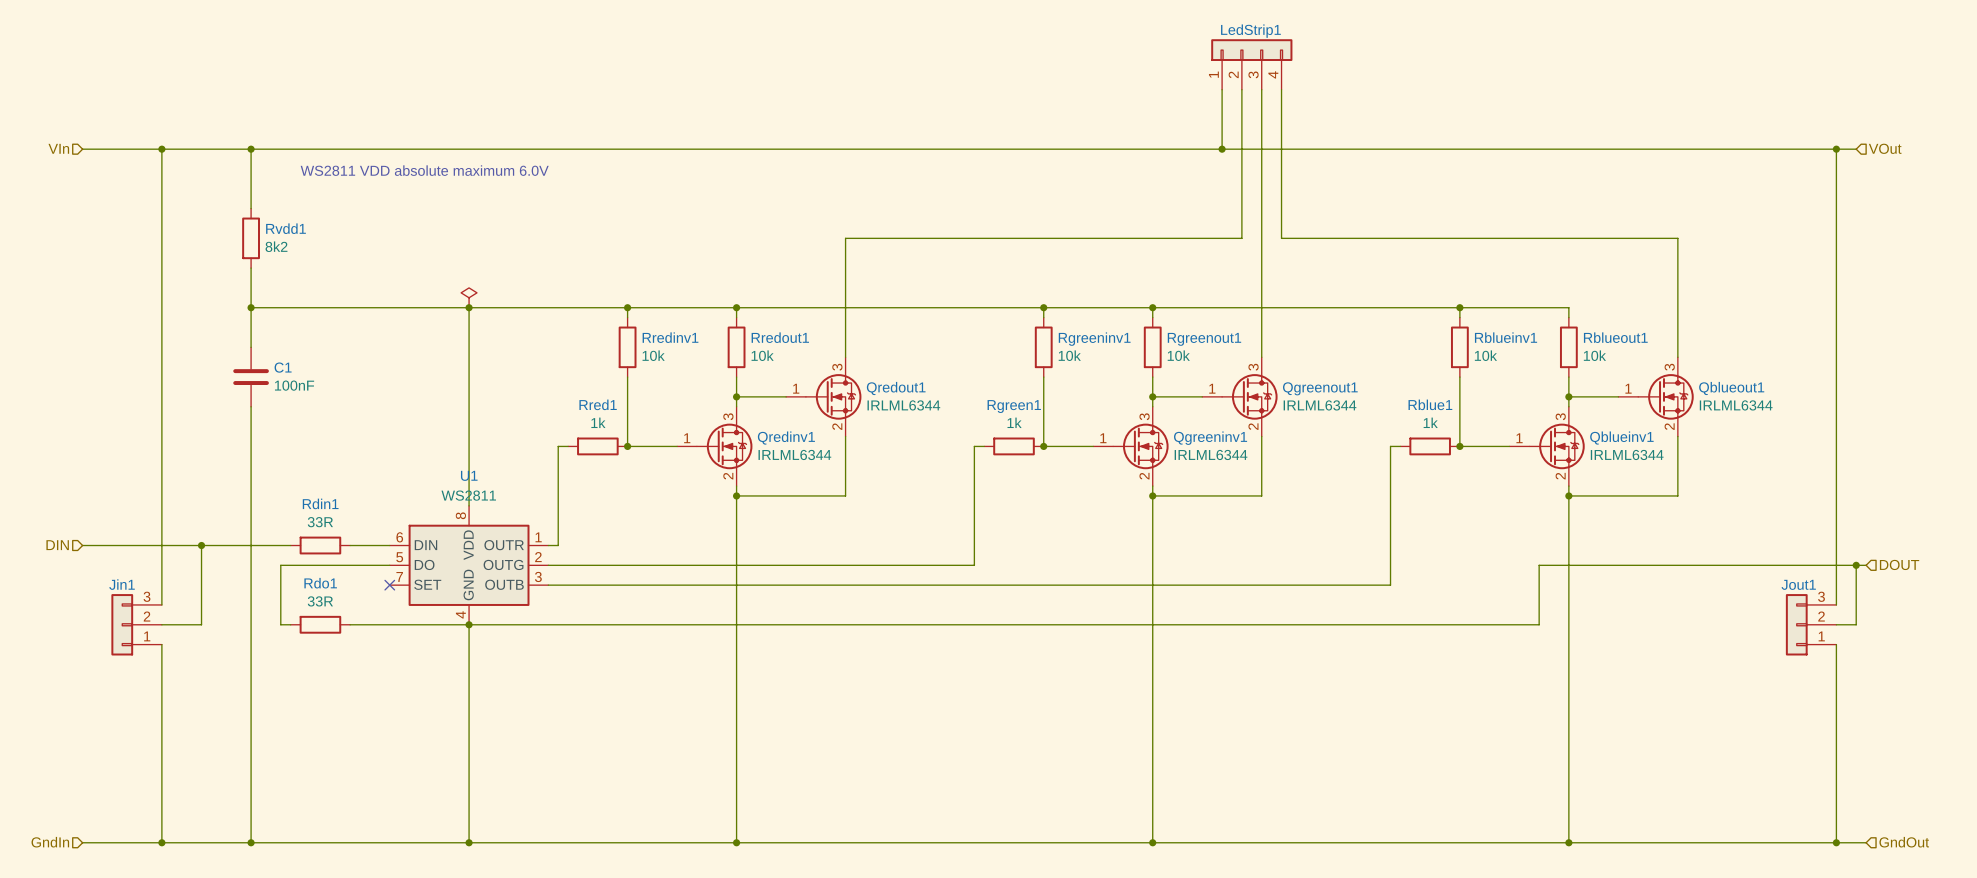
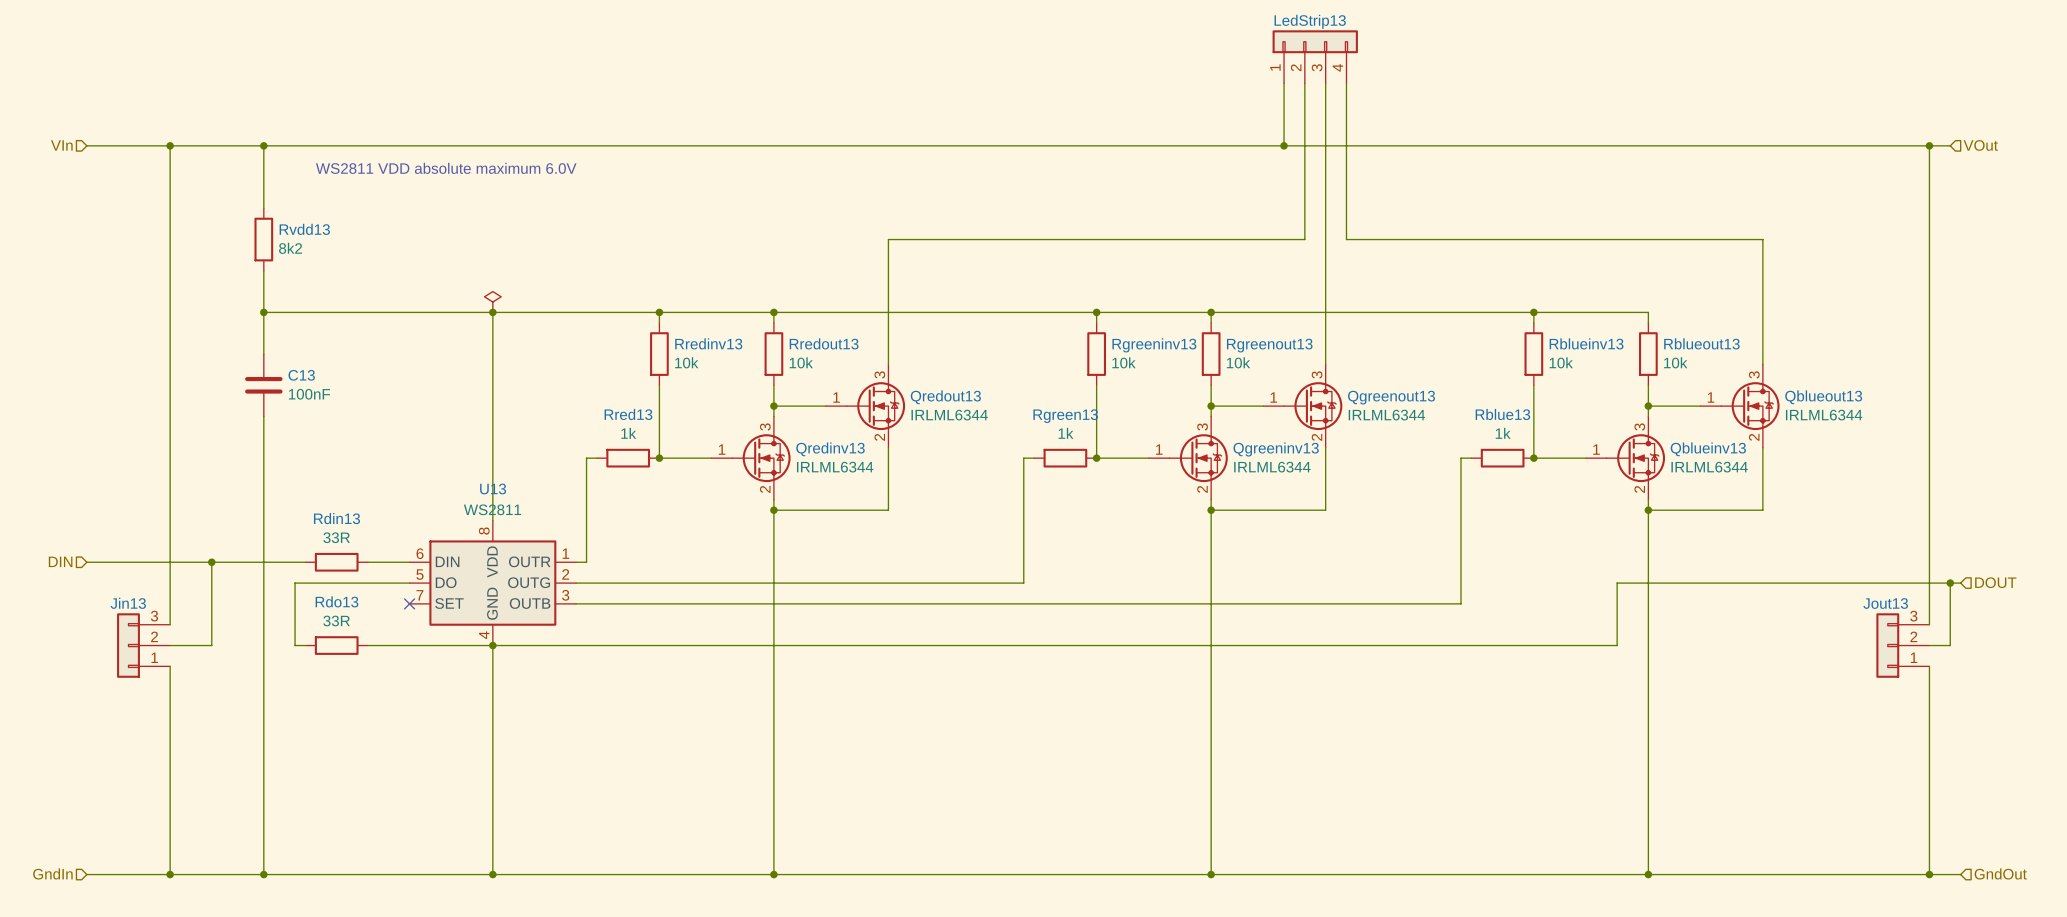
LedStrip1 name: LedStrip1 (1250, 31) -> LedStrip13 (1310, 21)
Rvdd1 name: Rvdd1 (285, 228) -> Rvdd13 (304, 229)
Rredinv1 name: Rredinv1 (670, 337) -> Rredinv13 (708, 343)
Rredout1 name: Rredout1 (780, 337) -> Rredout13 (824, 343)
Rblueinv1 name: Rblueinv1 (1506, 337) -> Rblueinv13 (1586, 343)
Rblueout1 name: Rblueout1 (1615, 337) -> Rblueout13 (1701, 343)
Rgreeninv1 name: Rgreeninv1 (1094, 339) -> Rgreeninv13 (1154, 345)
Rgreenout1 name: Rgreenout1 (1204, 339) -> Rgreenout13 (1269, 345)
C1 name: C1 (283, 367) -> C13 (301, 375)
Qredout1 name: Qredout1 (896, 388) -> Qredout13 (945, 397)
Qgreenout1 name: Qgreenout1 (1320, 388) -> Qgreenout13 (1391, 397)
Qblueout1 name: Qblueout1 (1731, 388) -> Qblueout13 (1823, 397)
Rred1 name: Rred1 (598, 404) -> Rred13 (628, 414)
Rblue1 name: Rblue1 (1430, 404) -> Rblue13 (1502, 414)
Rgreen1 name: Rgreen1 (1014, 406) -> Rgreen13 (1065, 416)
Qredinv1 name: Qredinv1 (786, 438) -> Qredinv13 (830, 449)
Qgreeninv1 name: Qgreeninv1 (1210, 438) -> Qgreeninv13 (1276, 449)
Qblueinv1 name: Qblueinv1 (1621, 438) -> Qblueinv13 (1708, 449)
U1 name: U1 (469, 475) -> U13 (493, 488)
Rdin1 name: Rdin1 (320, 503) -> Rdin13 (336, 518)
Rdo1 name: Rdo1 (320, 583) -> Rdo13 (336, 601)
Jin1 name: Jin1 (122, 584) -> Jin13 (128, 603)
Jout1 name: Jout1 (1798, 584) -> Jout13 (1885, 603)

